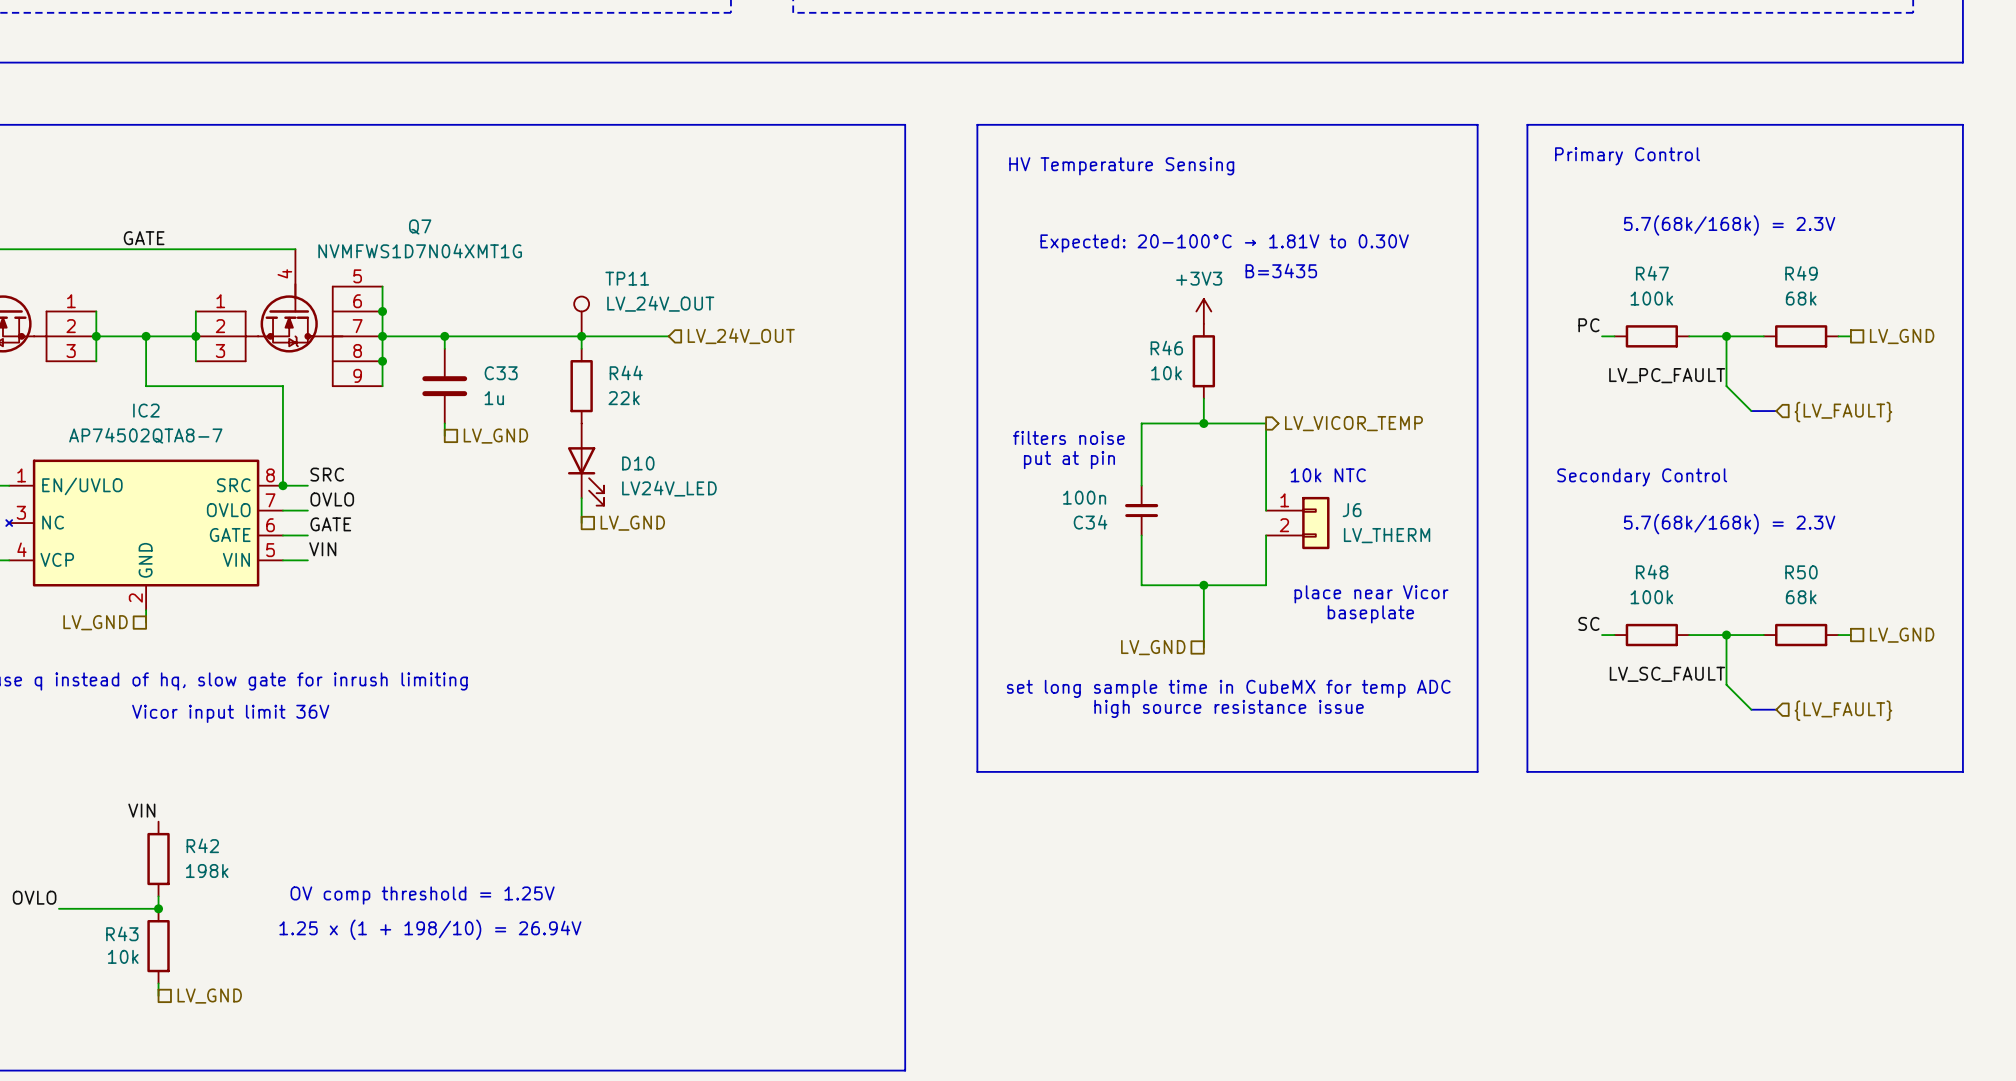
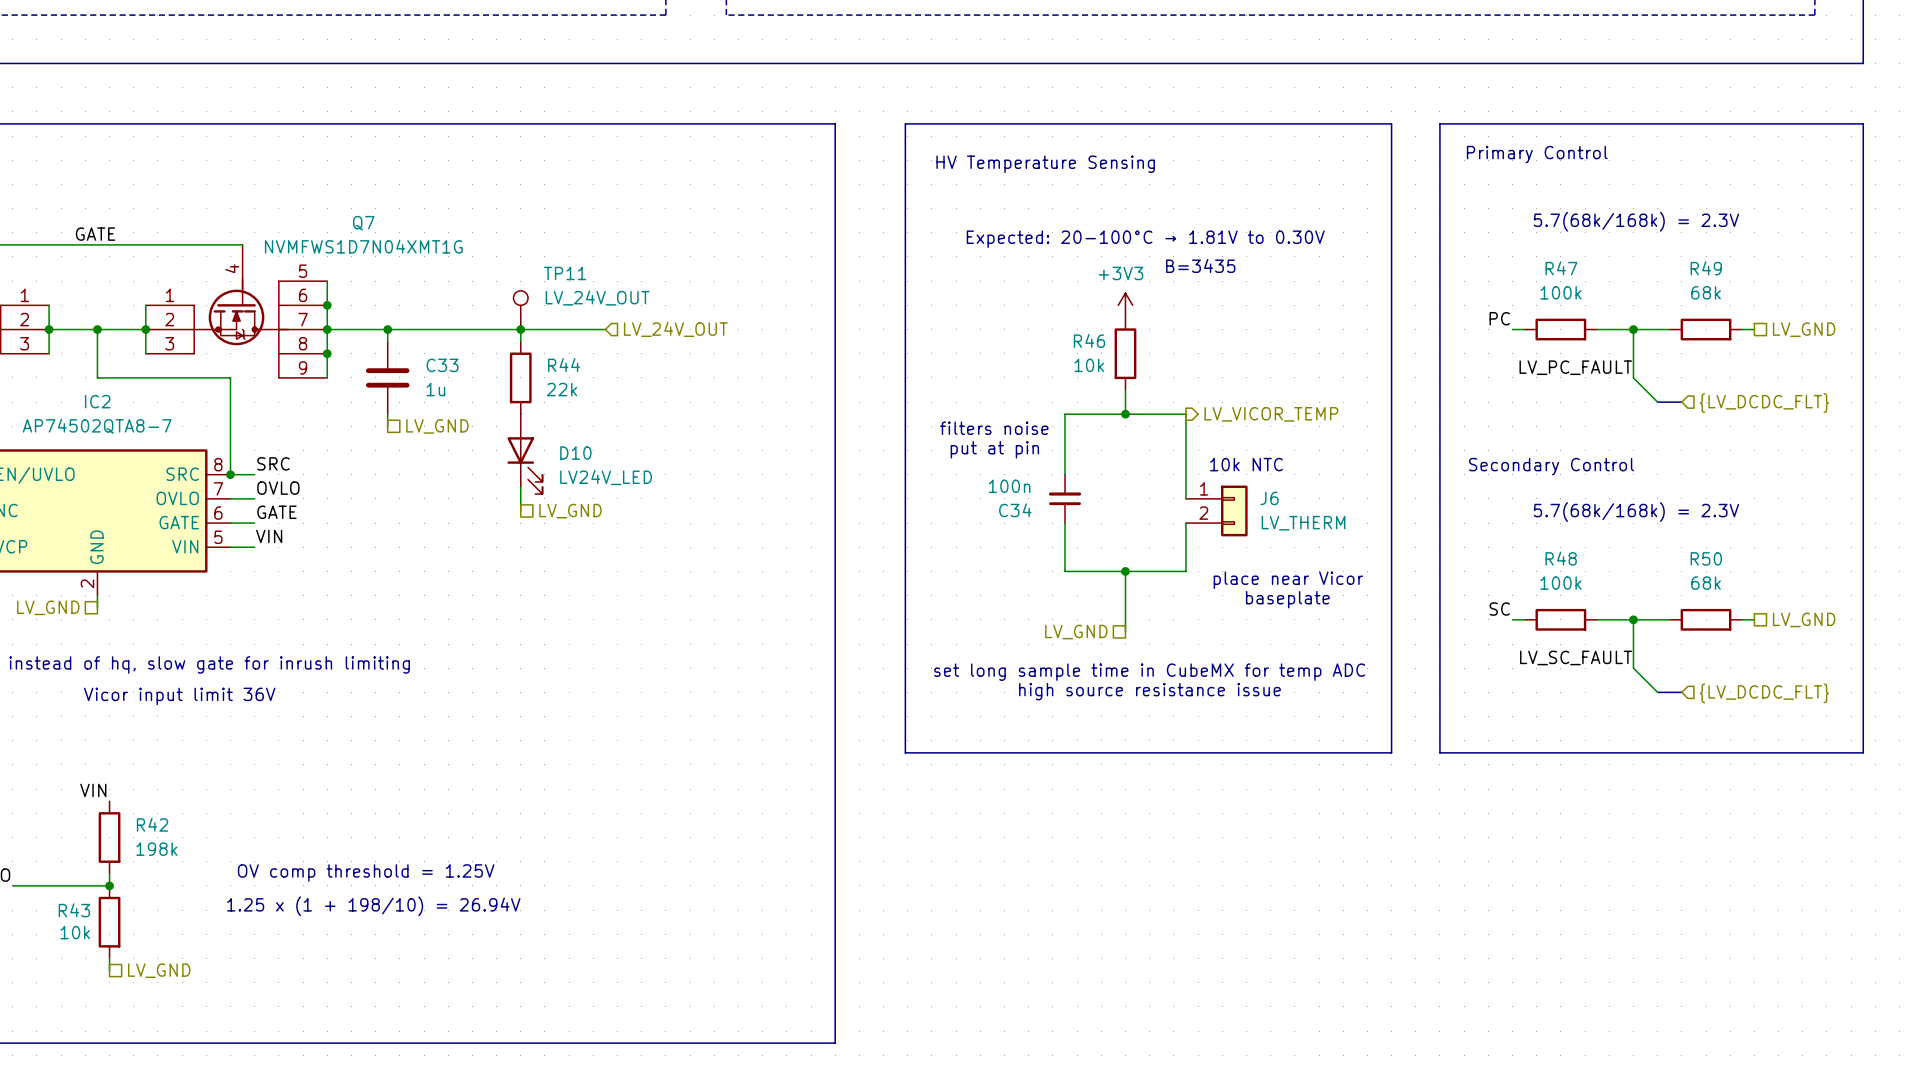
hierarchical label: {LV_FAULT} (1843, 412) -> {LV_DCDC_FLT} (1764, 403)
hierarchical label: {LV_FAULT} (1843, 710) -> {LV_DCDC_FLT} (1764, 693)

